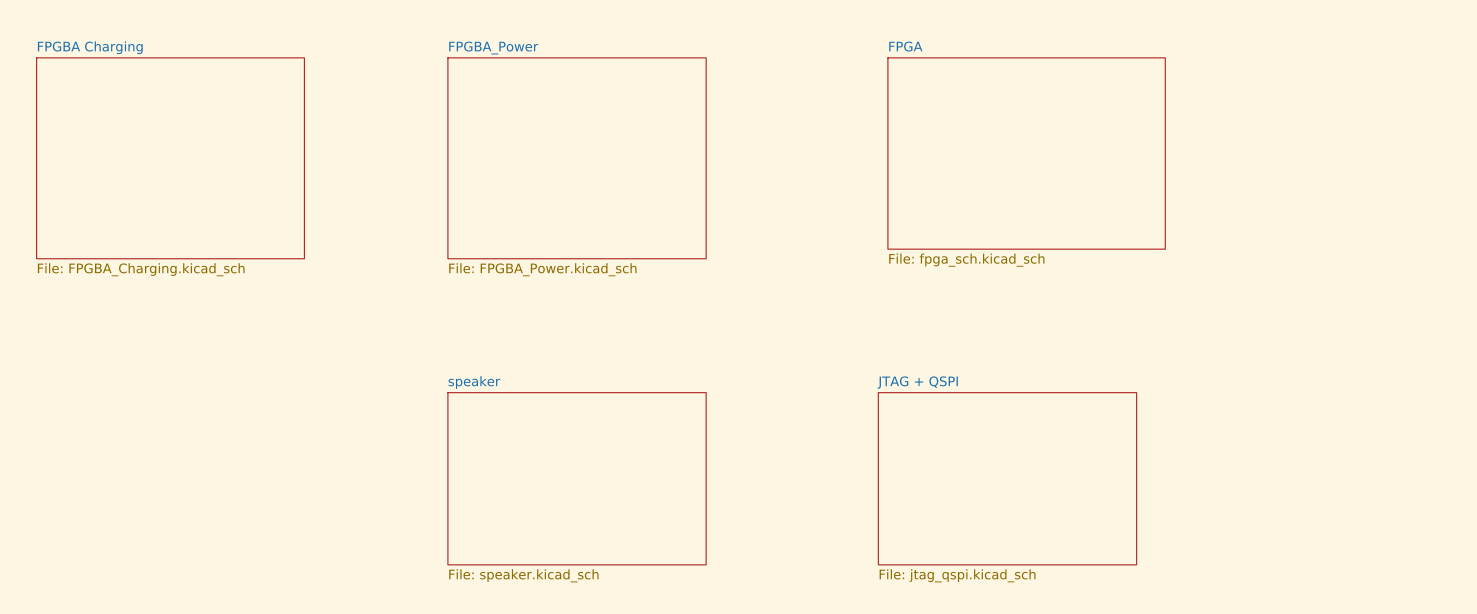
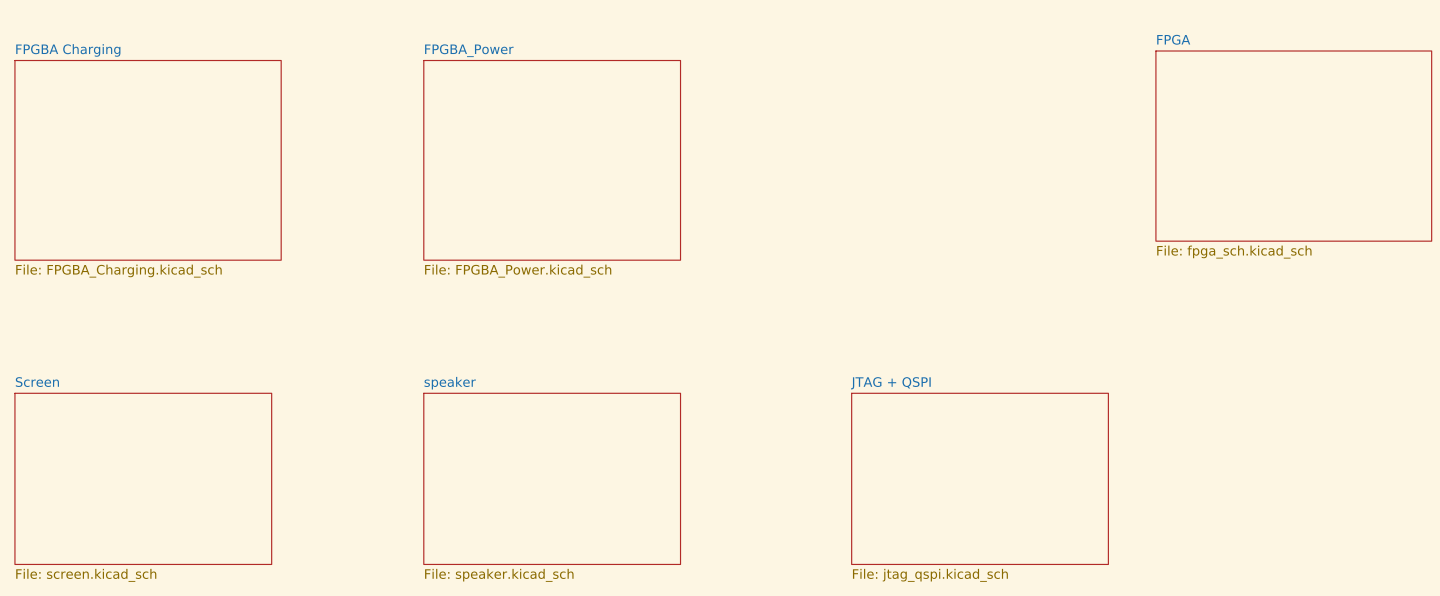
sheet FPGA: none -> File: fpga_sch.kicad_sch (1293, 146)
sheet FPGA: File: fpga_sch.kicad_sch (1026, 153) -> none
sheet Screen: none -> File: screen.kicad_sch (143, 478)

